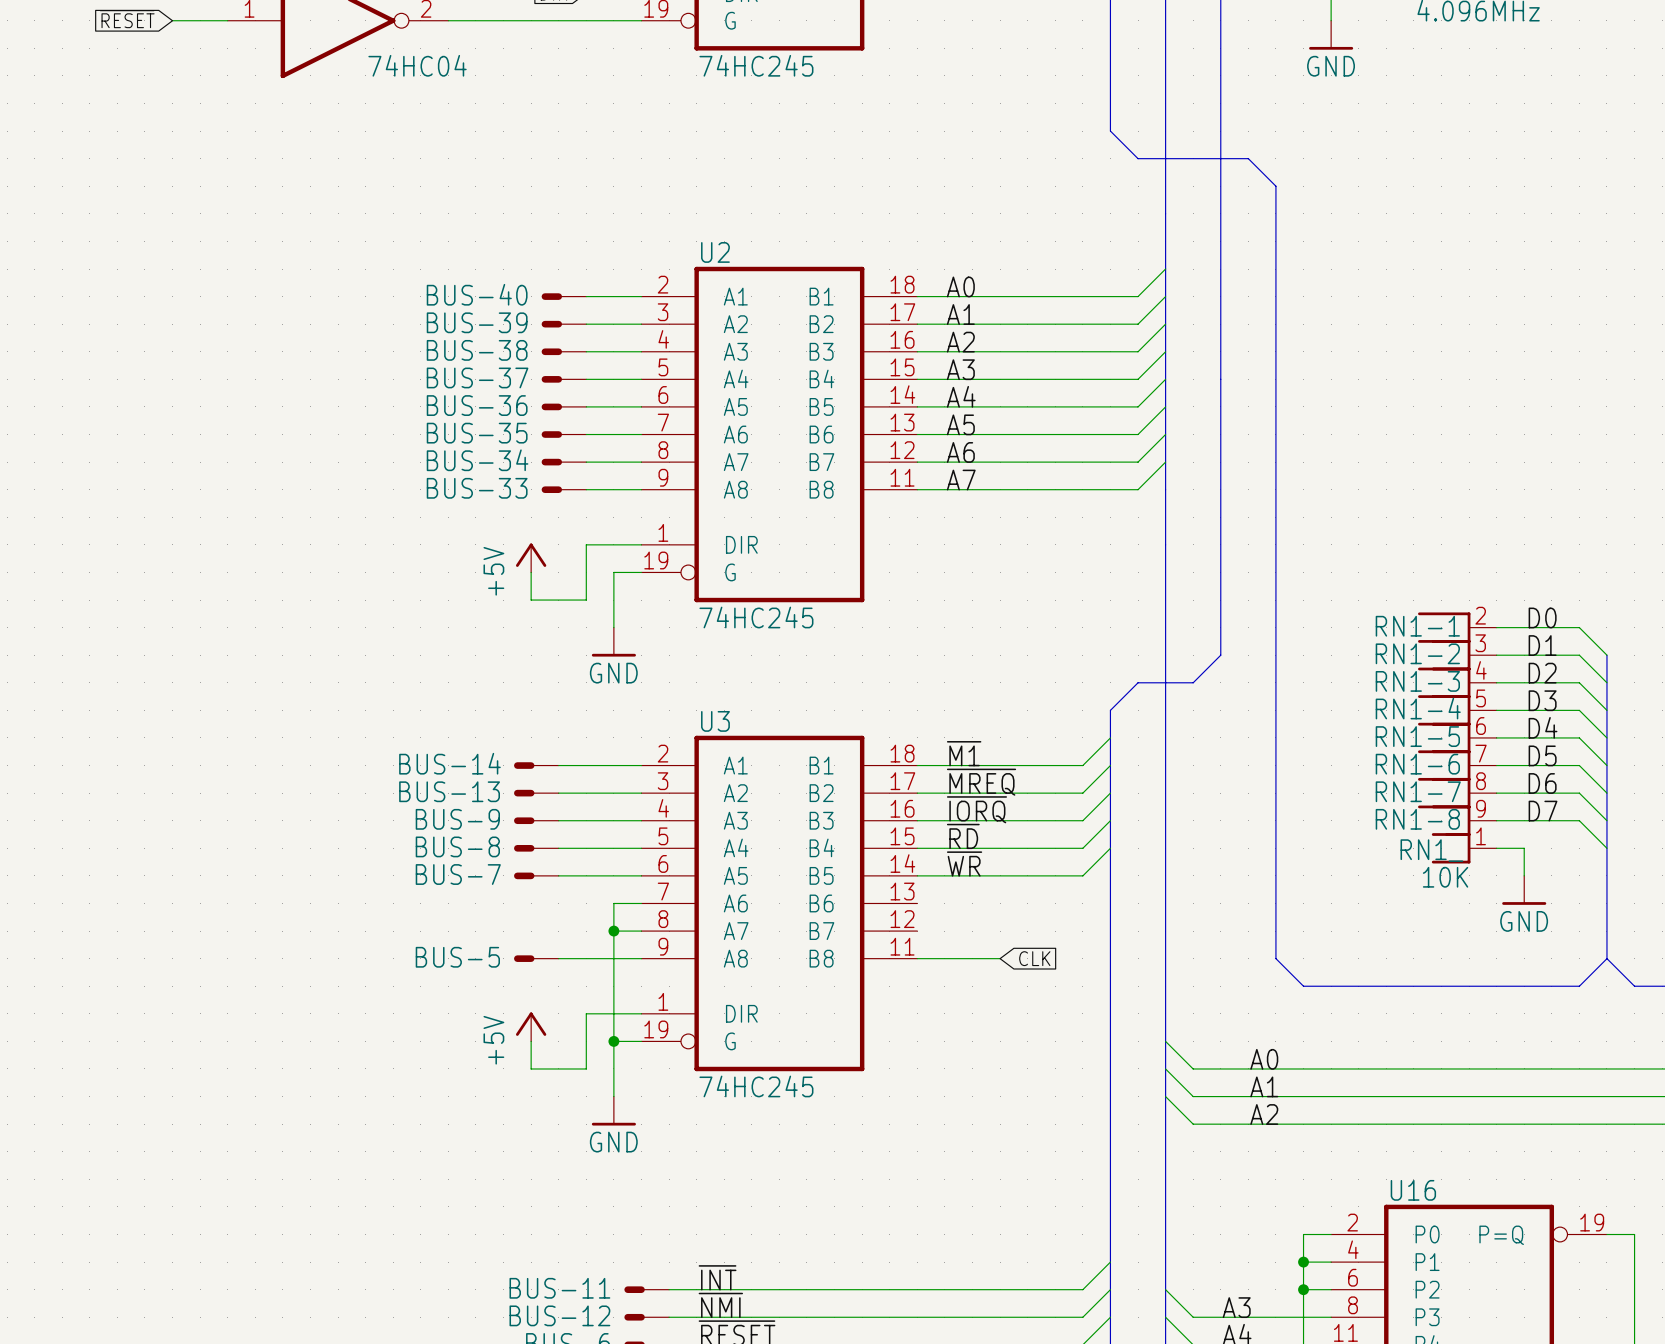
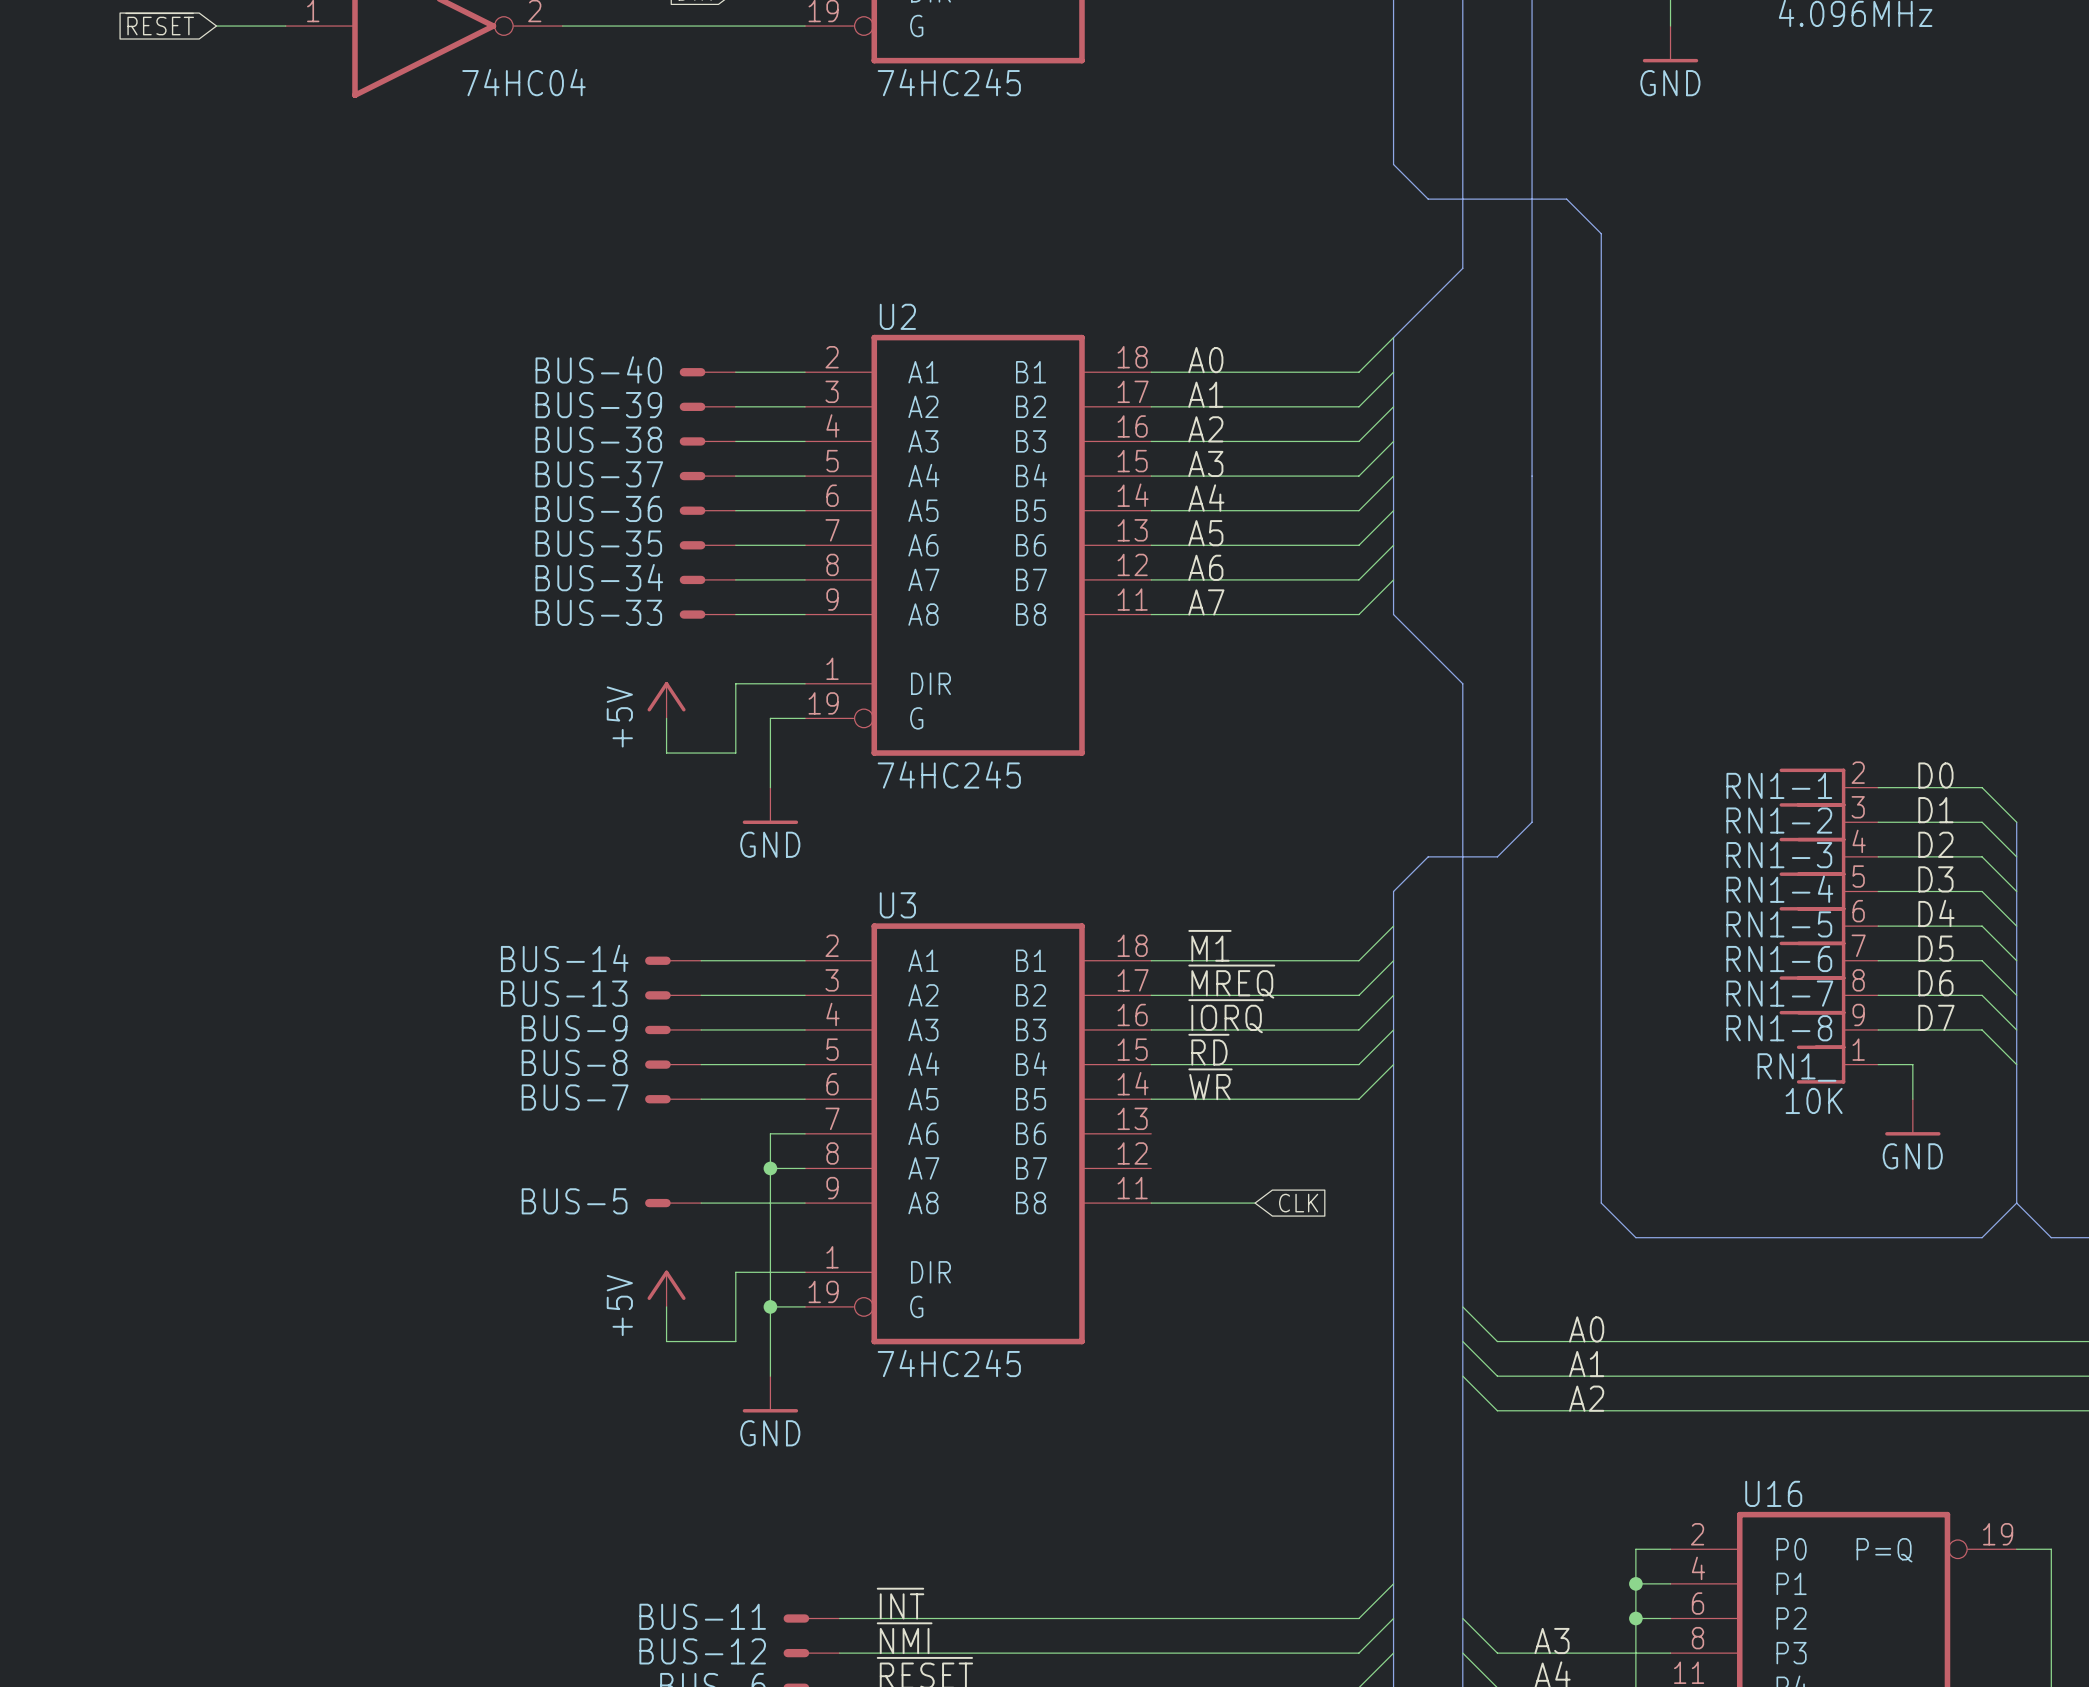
bus: (1165, 213) (1165, 544) -> (1462, 268) (1393, 337) (1393, 614) (1462, 683)
wire: (1165, 269) (1138, 296) (1082, 296) -> (1393, 337) (1358, 372)
wire: (1165, 296) (1138, 324) (1082, 324) -> (1393, 372) (1358, 406)
wire: (1165, 324) (1138, 351) (1082, 351) -> (1393, 406) (1358, 441)
wire: (1165, 351) (1138, 379) (1082, 379) -> (1393, 441) (1358, 476)
wire: (1165, 379) (1138, 406) (1082, 406) -> (1393, 476) (1358, 510)
wire: (1165, 406) (1138, 434) (1082, 434) -> (1393, 510) (1358, 545)
wire: (1165, 434) (1138, 462) (1082, 462) -> (1393, 545) (1358, 579)
wire: (1165, 462) (1138, 489) (1082, 489) -> (1393, 579) (1358, 614)

